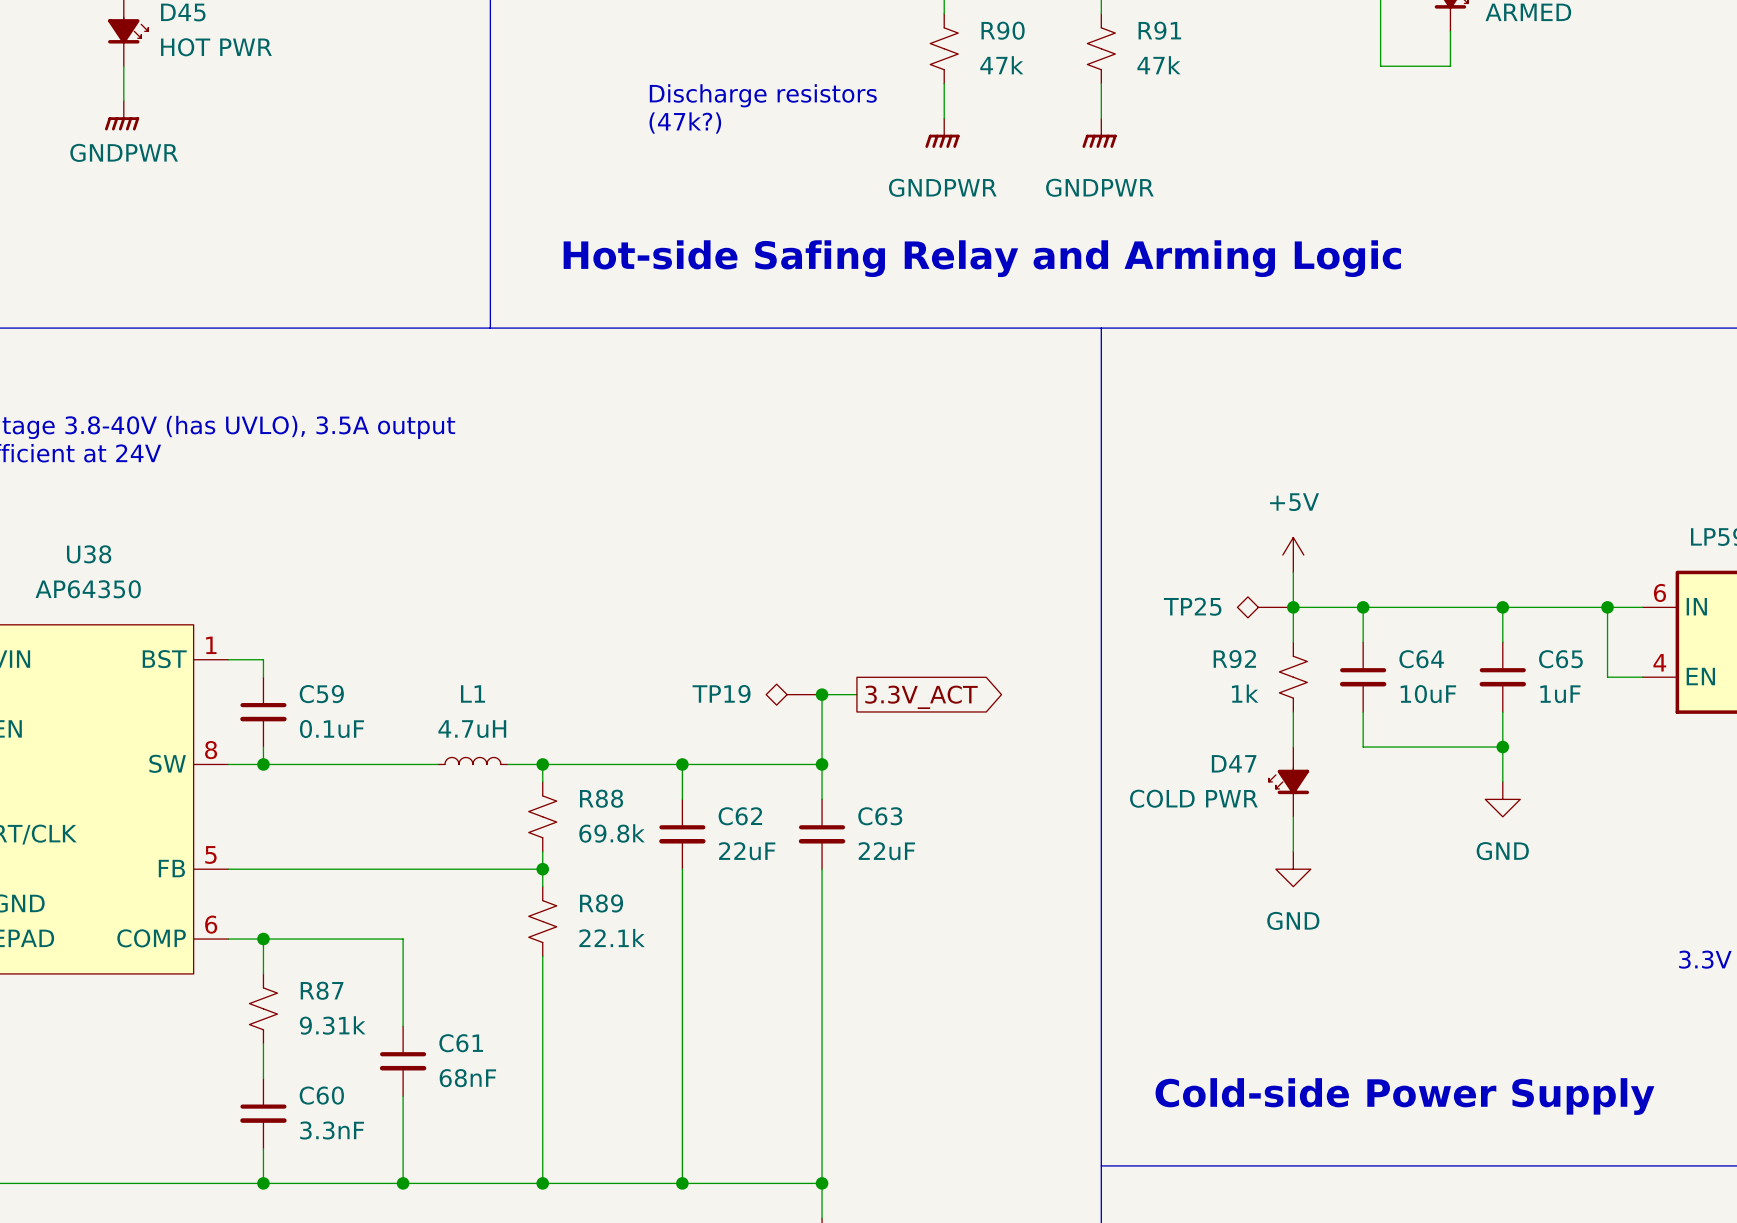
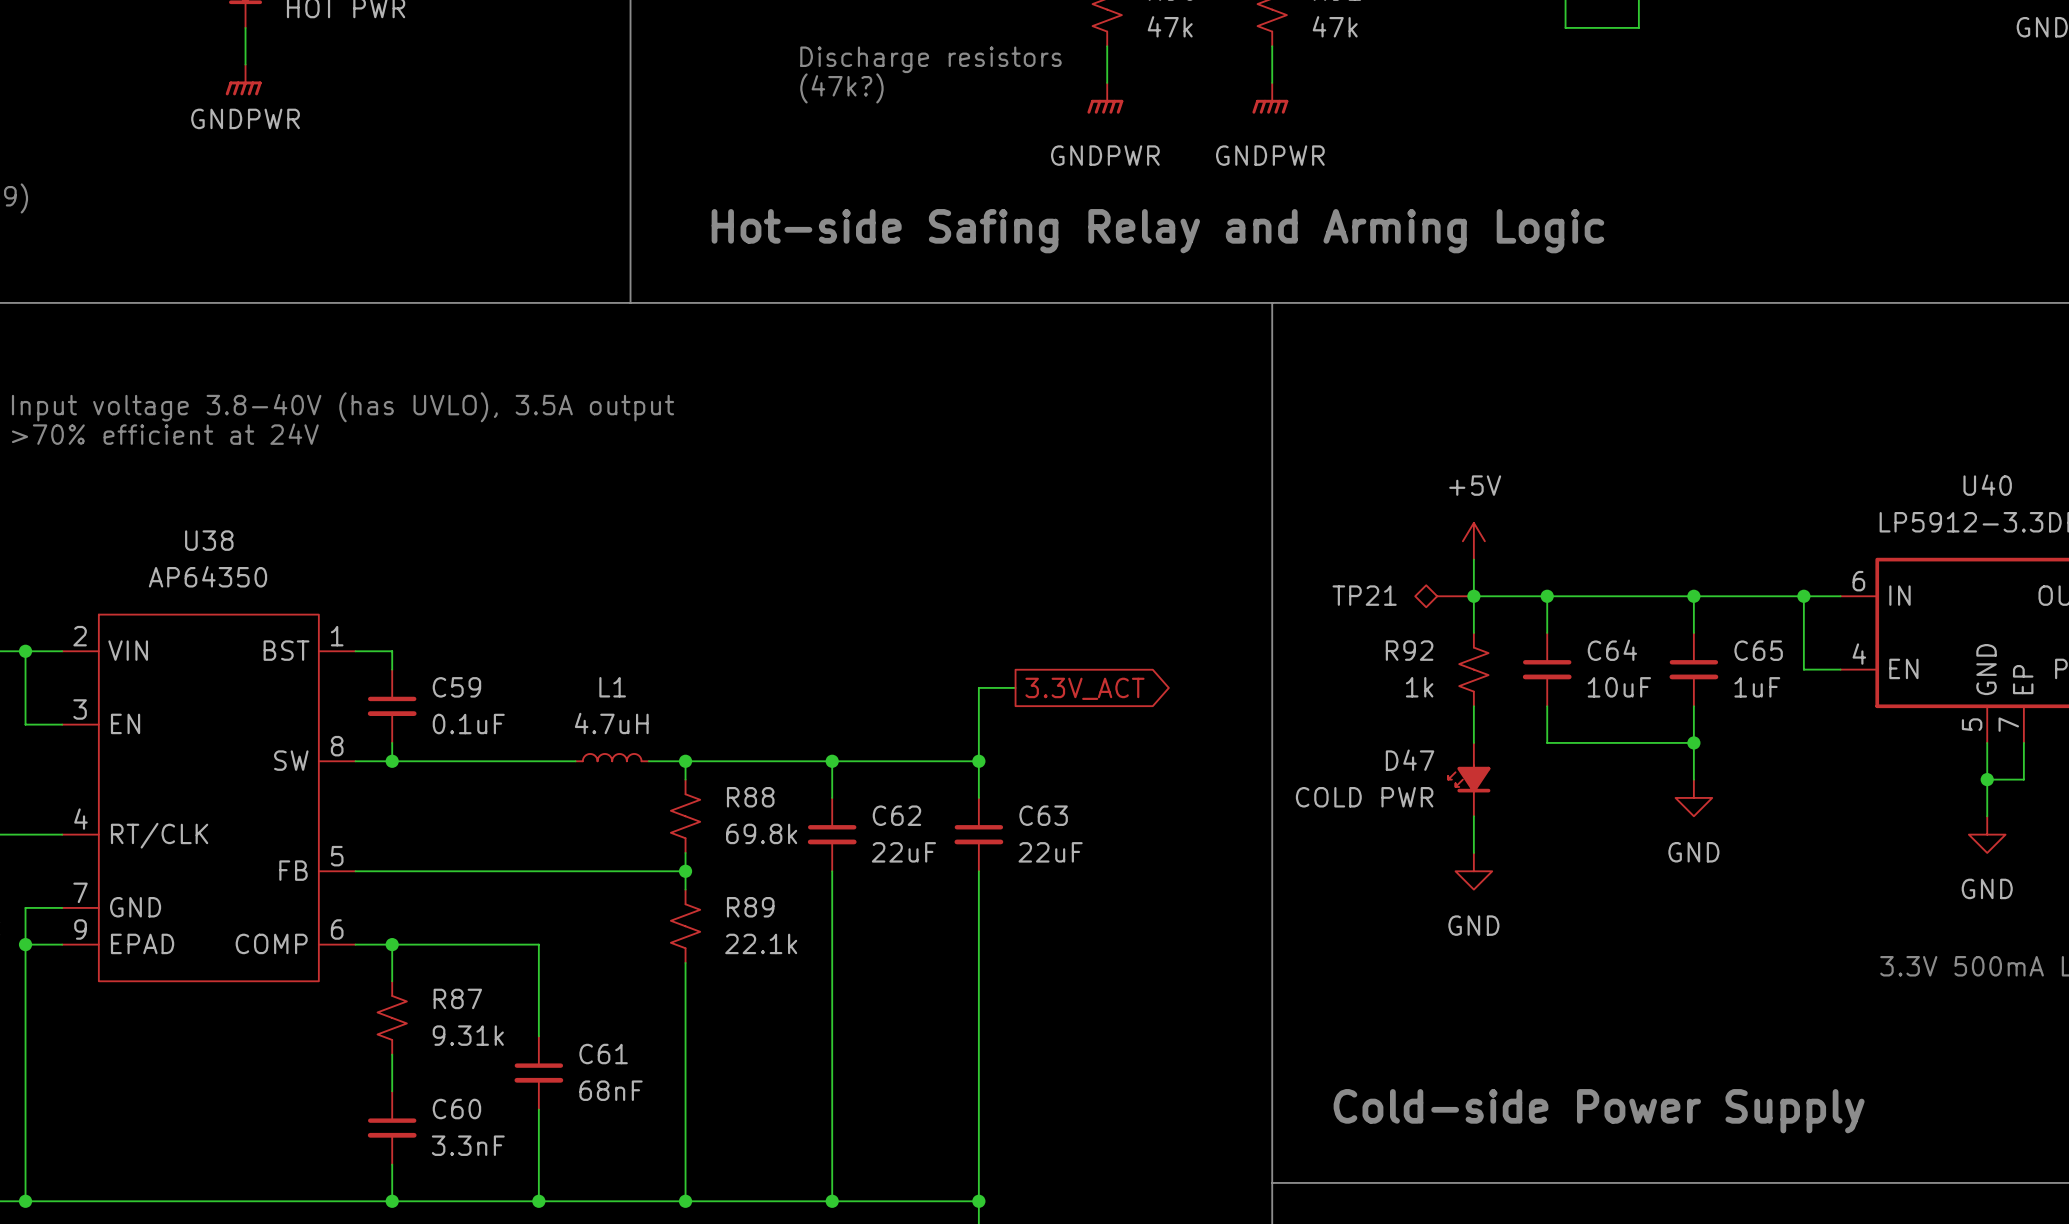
TP25 name: TP25 (1192, 606) -> TP21 (1364, 595)
TP19: (794, 694) -> none
junction: (822, 694) -> none

